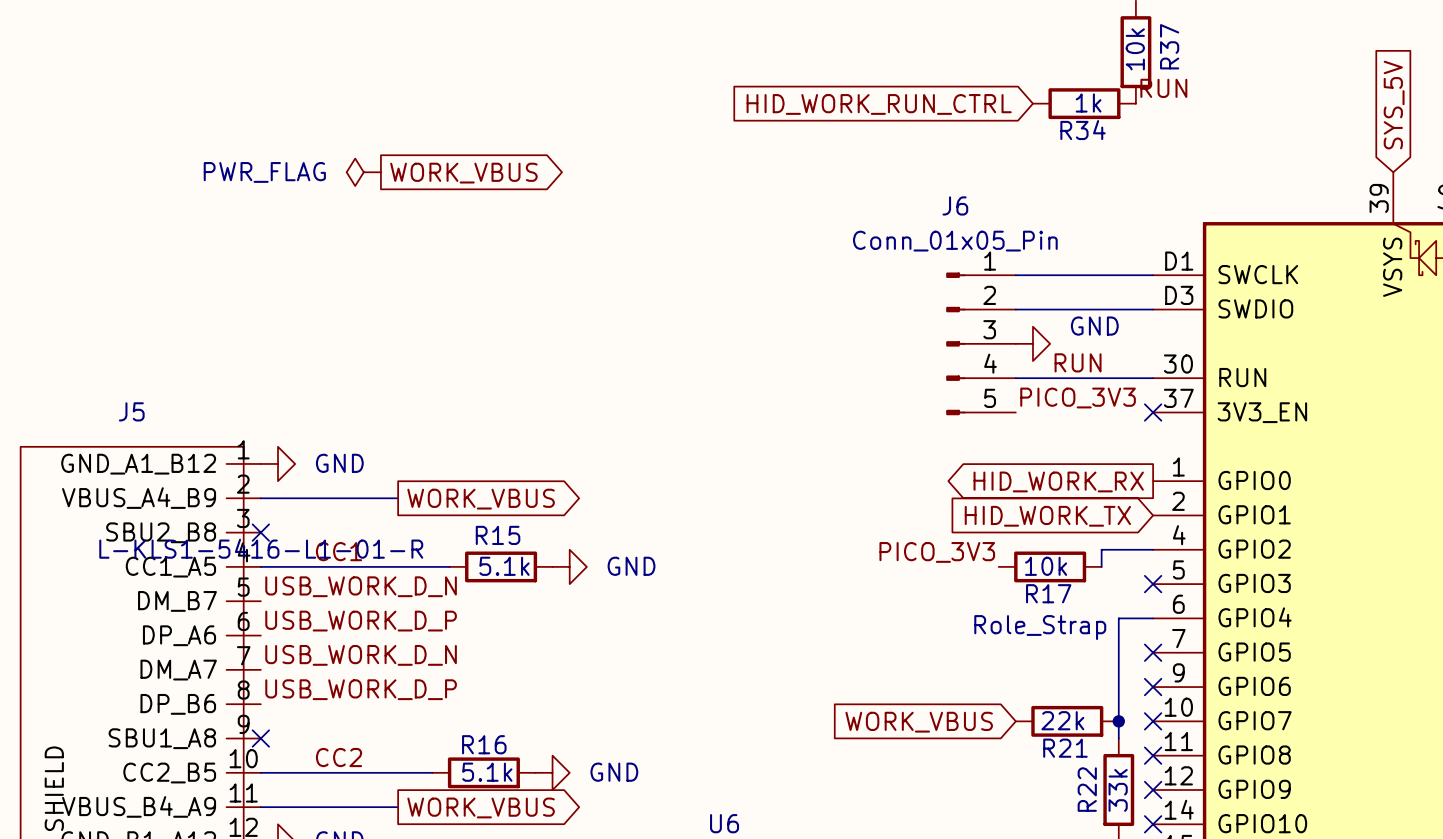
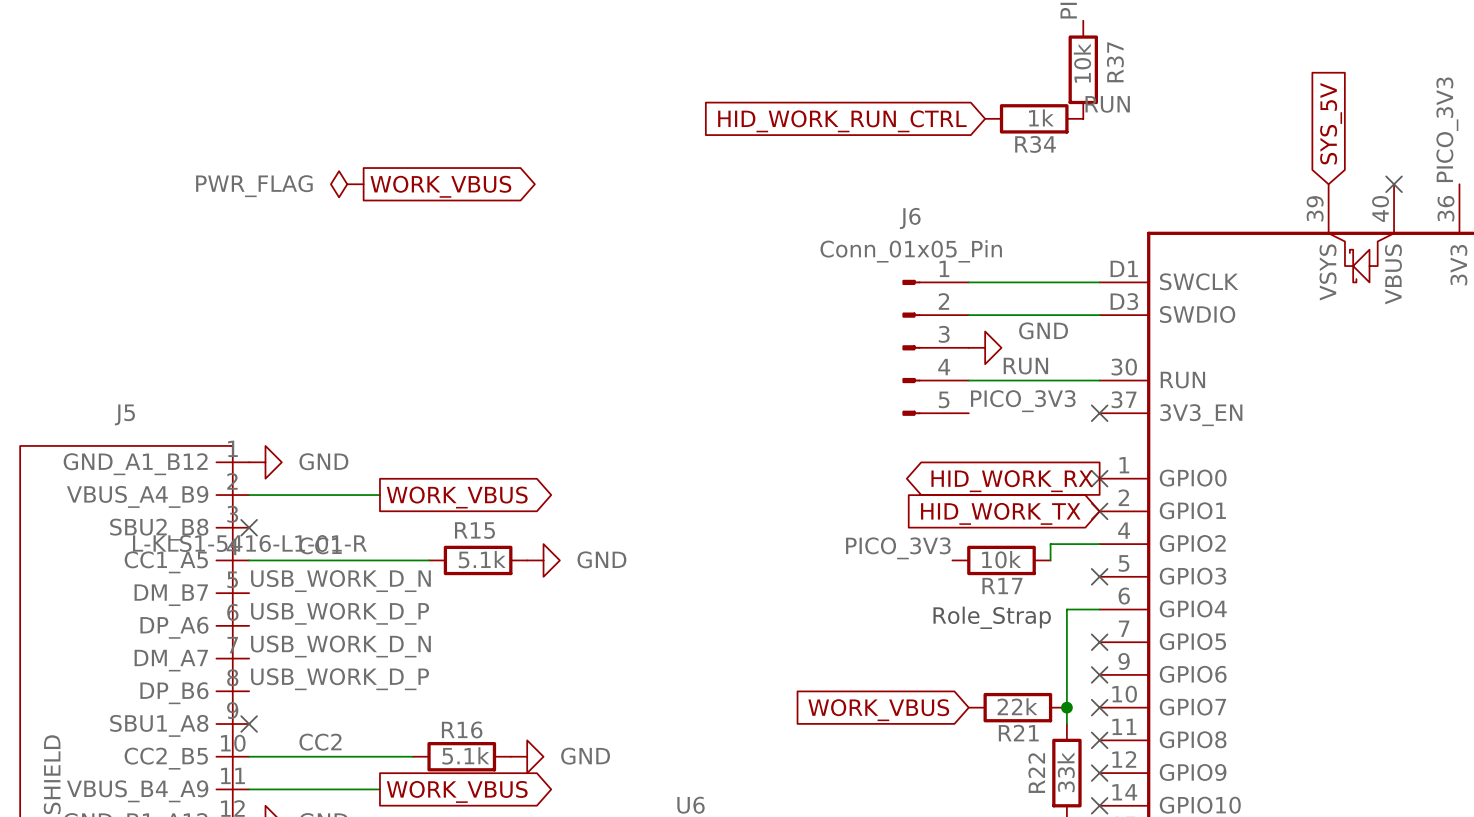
no-connect mark: none -> (1099, 478)
no-connect mark: none -> (1099, 511)

